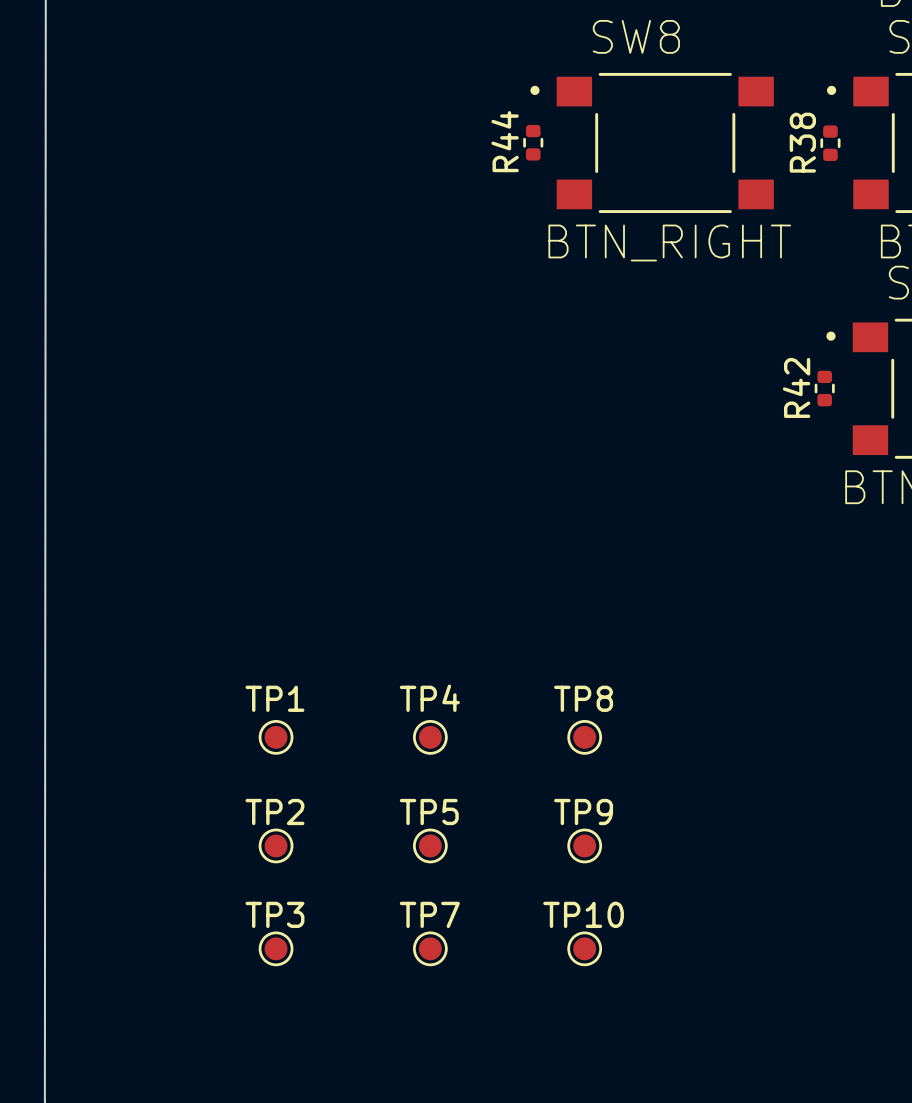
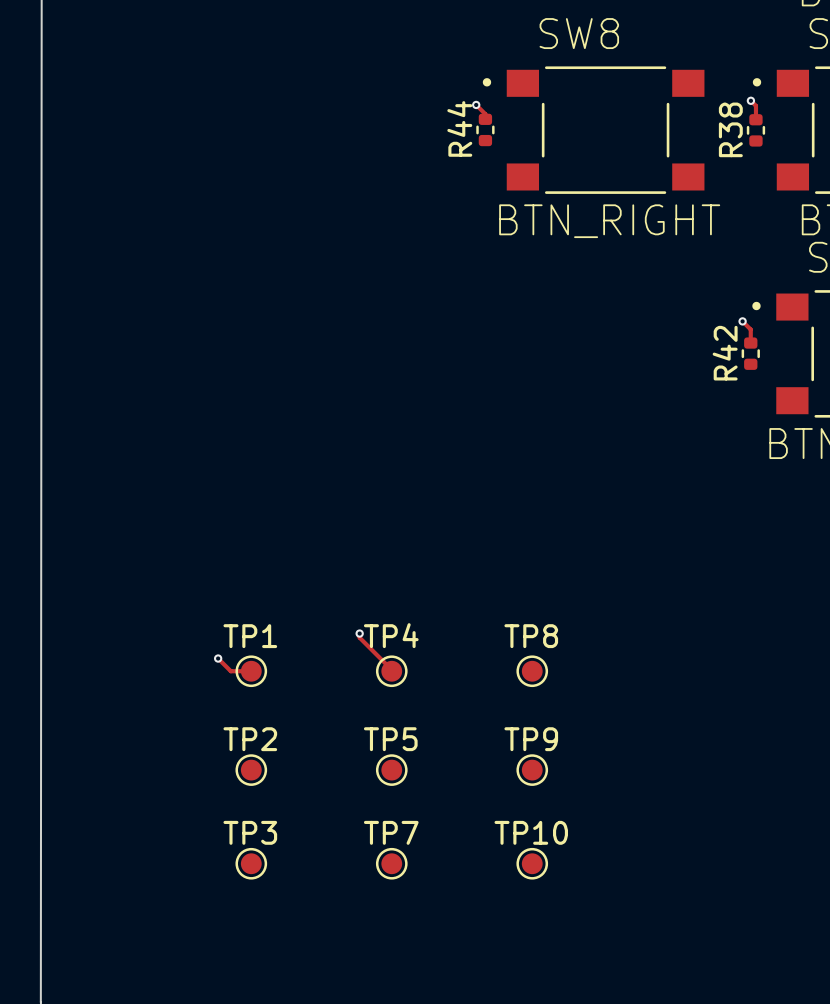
top track: none -> (750, 100) (755, 105) (755, 119)
via: none -> (750, 100)
top track: none -> (476, 104) (485, 114) (485, 119)
via: none -> (476, 104)
top track: none -> (742, 321) (750, 329) (750, 343)
via: none -> (742, 321)
top track: none -> (359, 633) (359, 637) (391, 671)
via: none -> (359, 633)
top track: none -> (218, 658) (230, 671) (251, 671)
via: none -> (218, 658)

